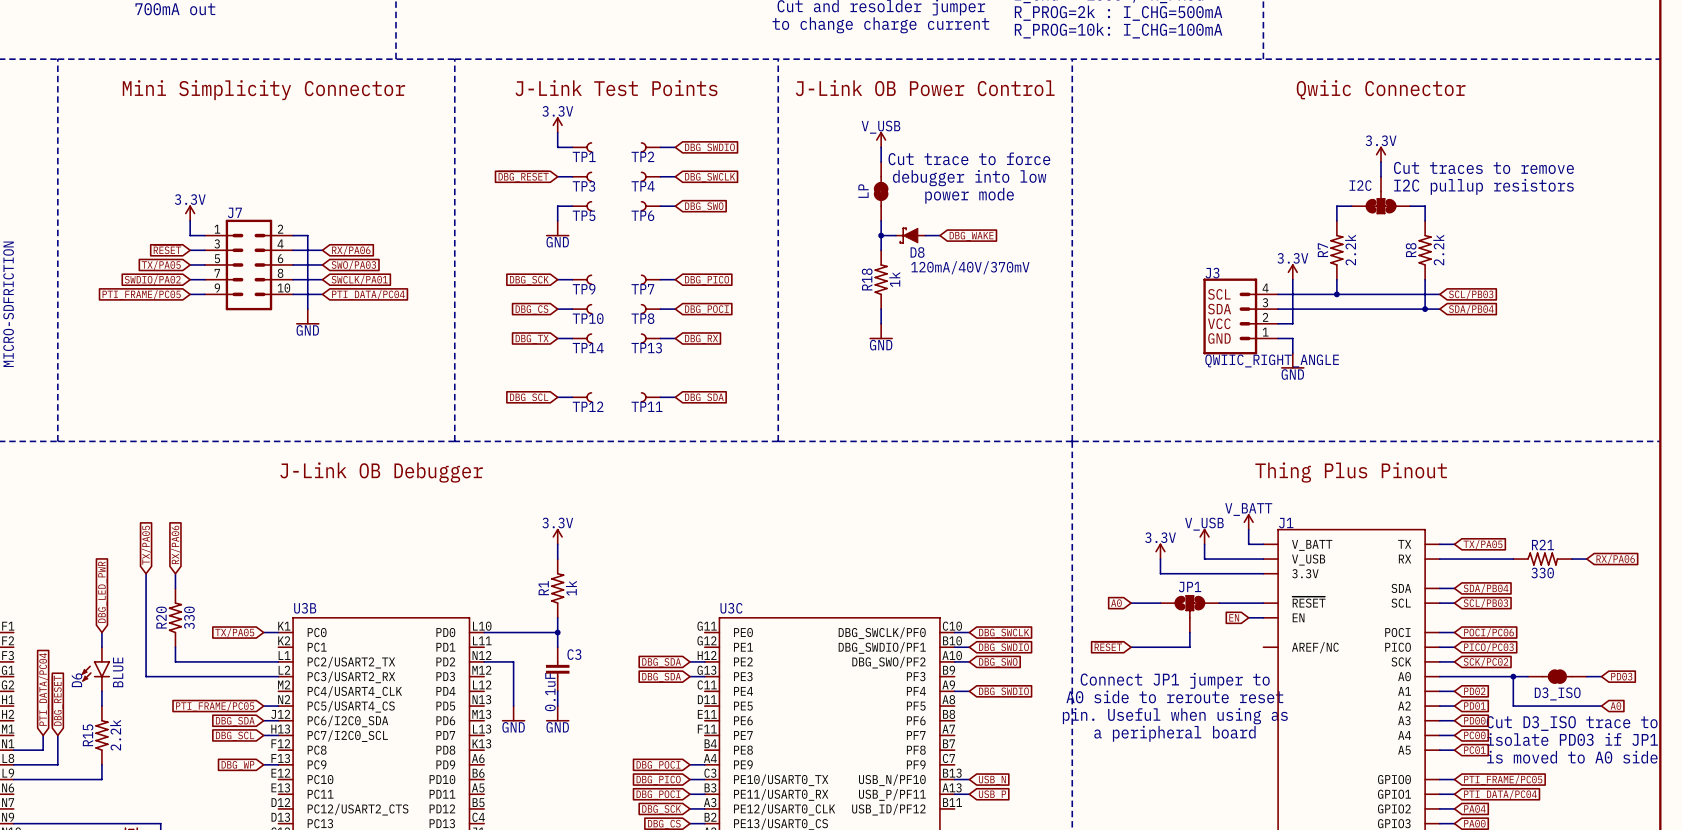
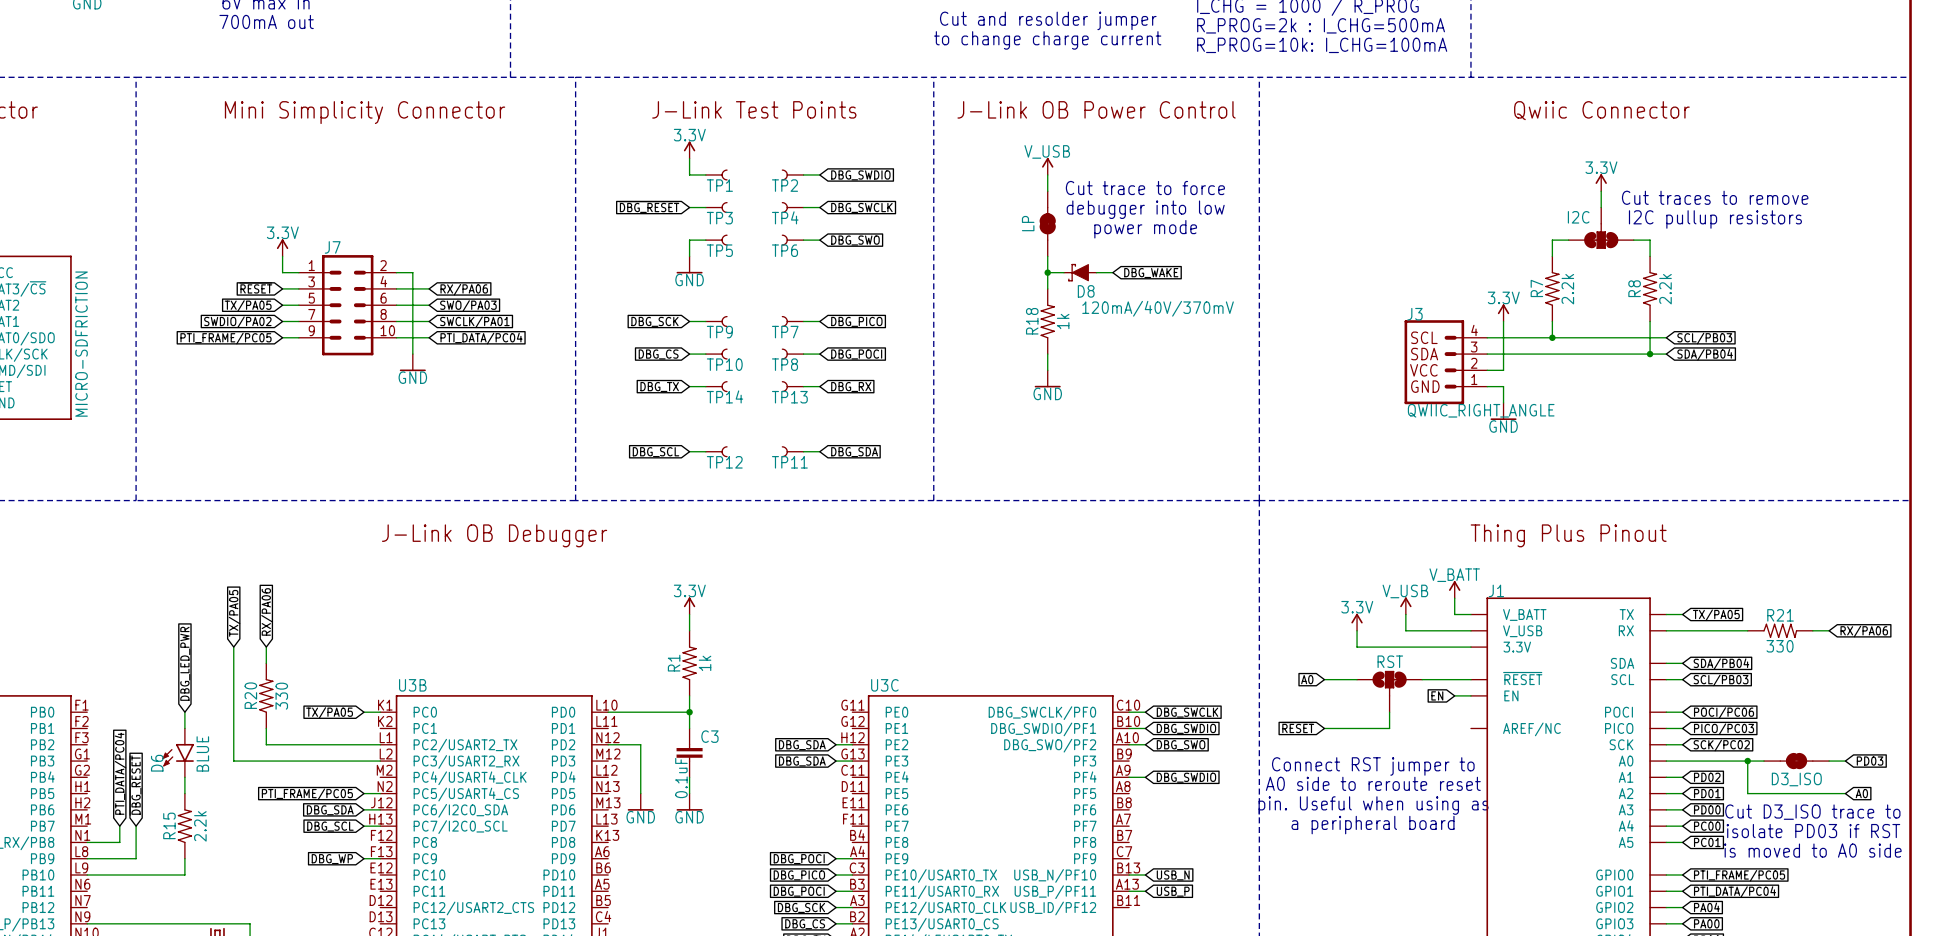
JP1 name: JP1 (1190, 587) -> RST (1390, 661)
text: Connect JP1 jumper to (1175, 680) -> Connect RST jumper to (1373, 766)
text: isolate PD03 if JP1 (1572, 739) -> isolate PD03 if RST (1813, 831)

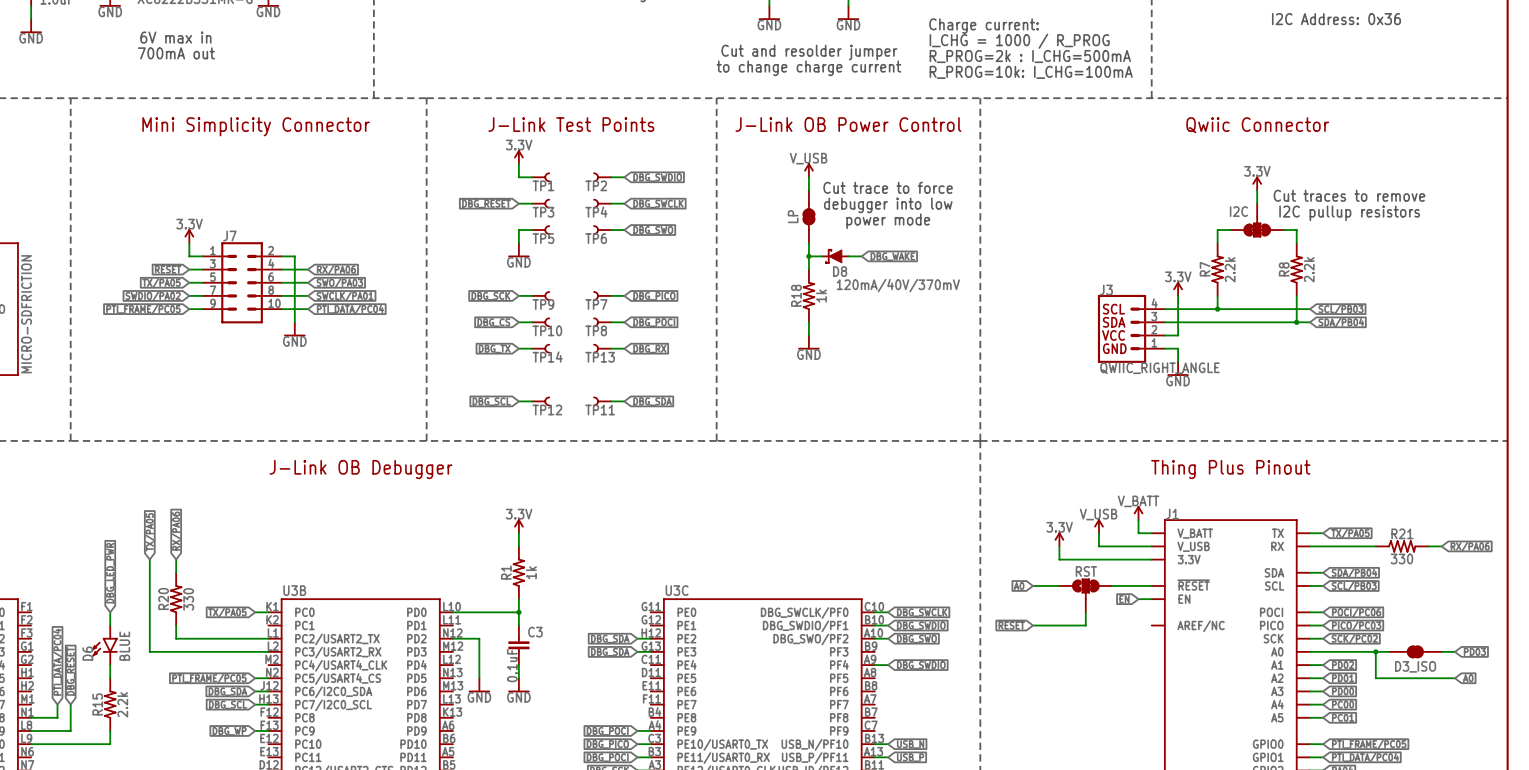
text: Connect RST jumper to (1373, 766) -> none
text: A0 side to reroute reset (1373, 783) -> none
text: pin. Useful when using as (1373, 805) -> none
text: Cut D3_ISO trace to (1812, 812) -> none
text: a peripheral board (1373, 825) -> none
text: isolate PD03 if RST (1813, 831) -> none
text: is moved to A0 side (1812, 850) -> none

